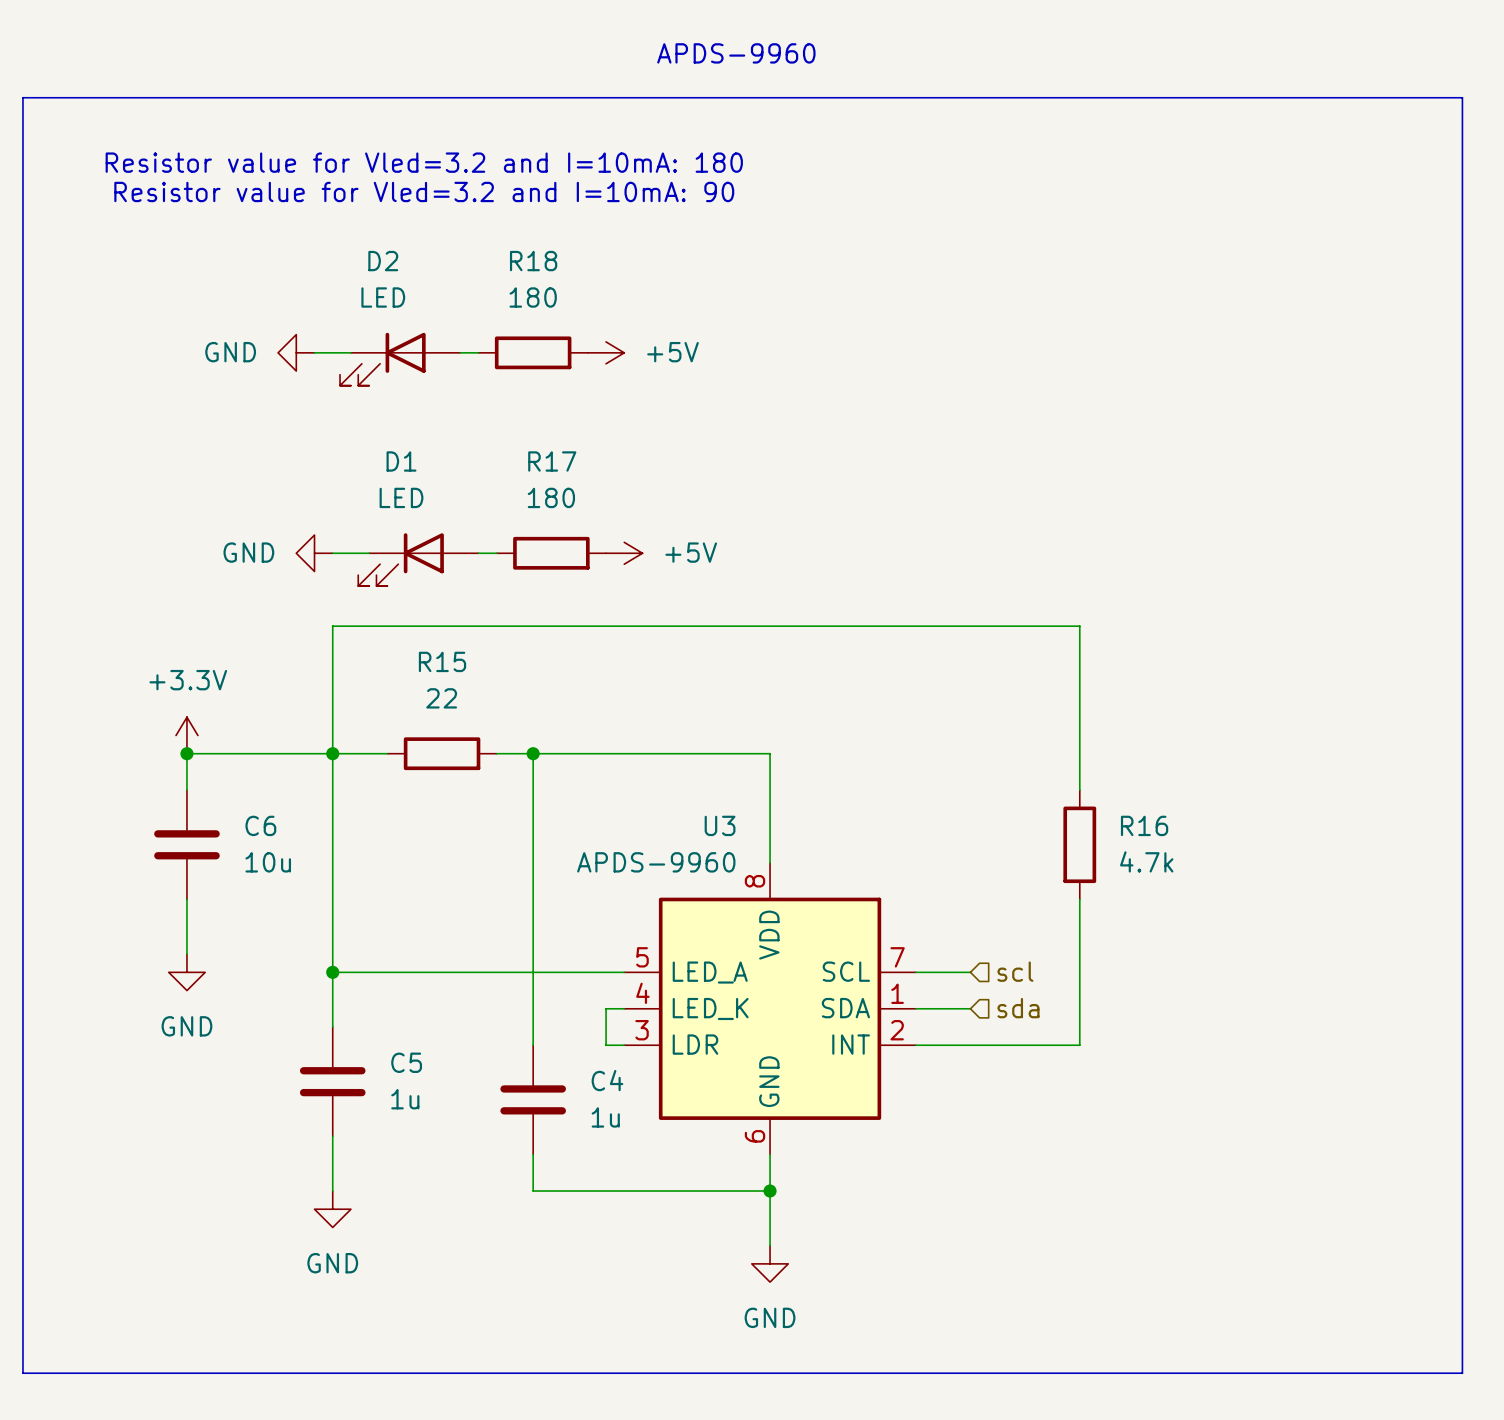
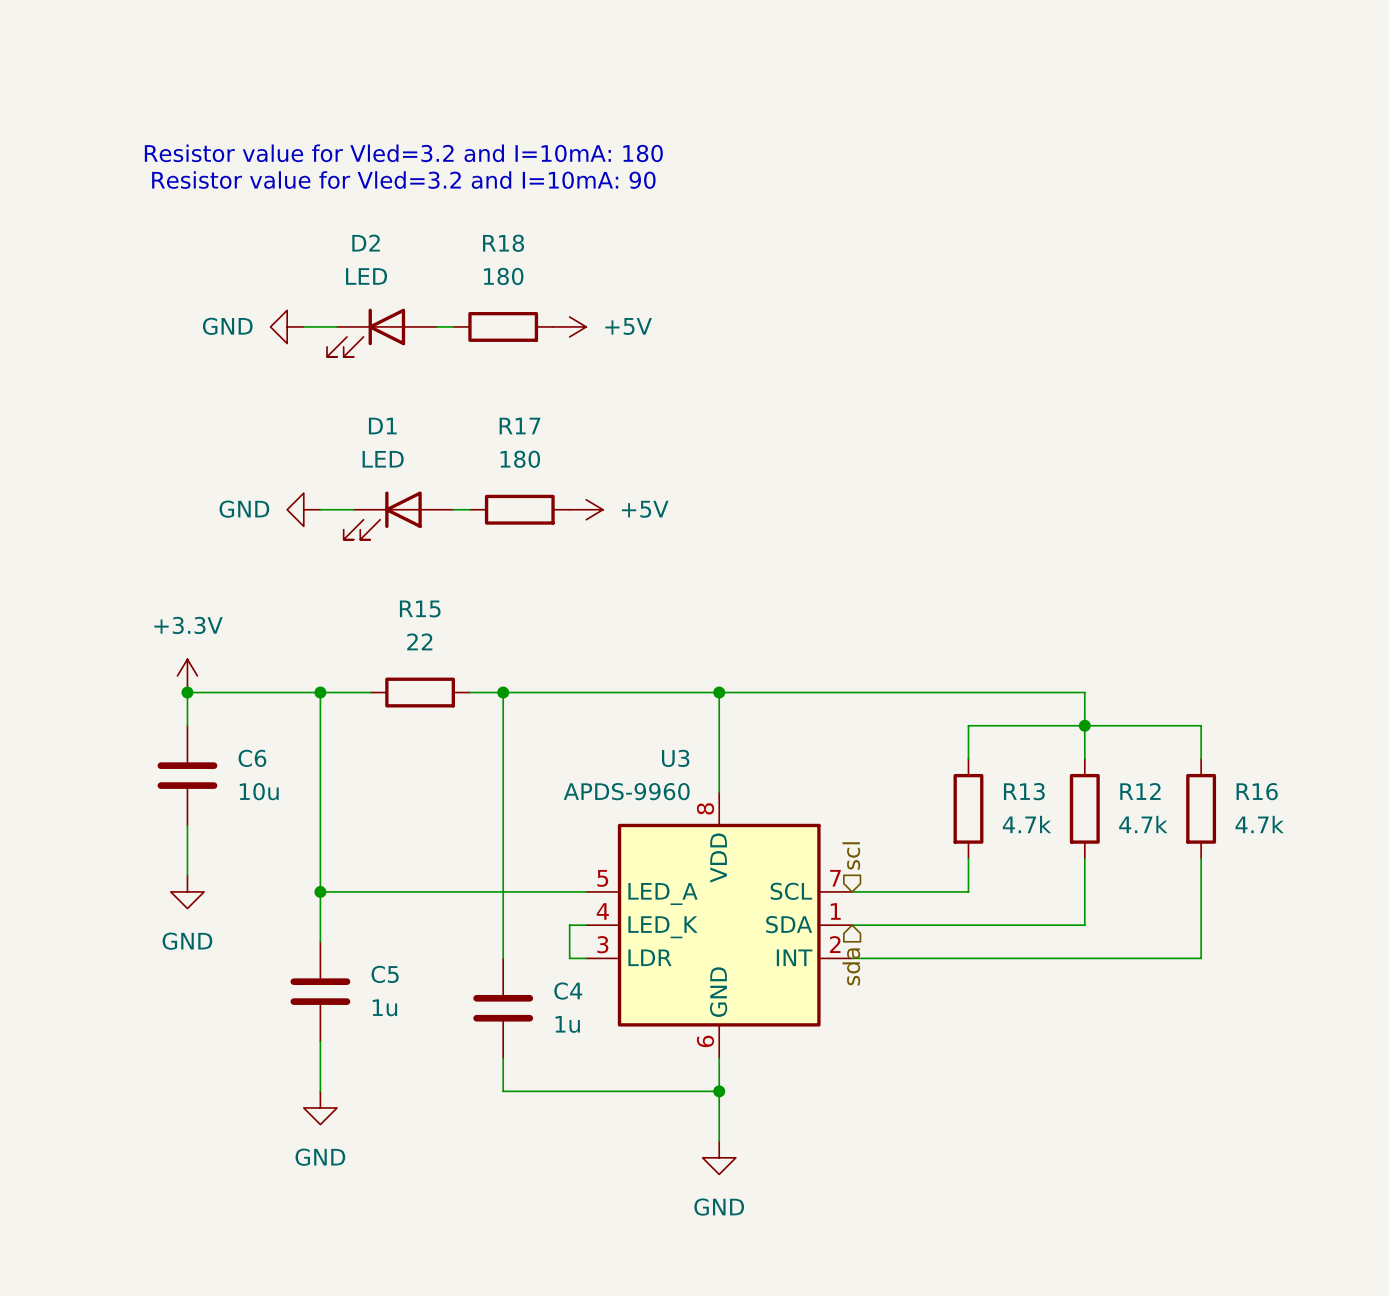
text: APDS-9960 (736, 53) -> none
line: (22, 97) (1462, 97) (1462, 1373) (22, 1373) (22, 97) -> none
wire: (332, 753) (332, 626) (1079, 626) (1079, 790) -> none
wire: none -> (719, 692) (1084, 692) (1084, 759)
junction: none -> (719, 692)
junction: none -> (1084, 725)
wire: none -> (968, 759) (968, 725) (1201, 725) (1201, 759)
R16 position: (1079, 844) -> (1201, 808)
R13: none -> 4.7k (968, 808)
R12: none -> 4.7k (1084, 808)
wire: (1079, 899) (1079, 1045) -> (1201, 858) (1201, 958) (1001, 958)
wire: none -> (968, 858) (968, 891) (902, 891)
wire: none -> (1084, 858) (1084, 925) (902, 925)
hierarchical label rotation: 0° (1015, 971) -> 90° counterclockwise (851, 855)
hierarchical label position: scl (1015, 971) -> scl (851, 855)
hierarchical label rotation: 0° (1018, 1008) -> 90° clockwise (851, 966)
hierarchical label position: sda (1018, 1008) -> sda (851, 966)

